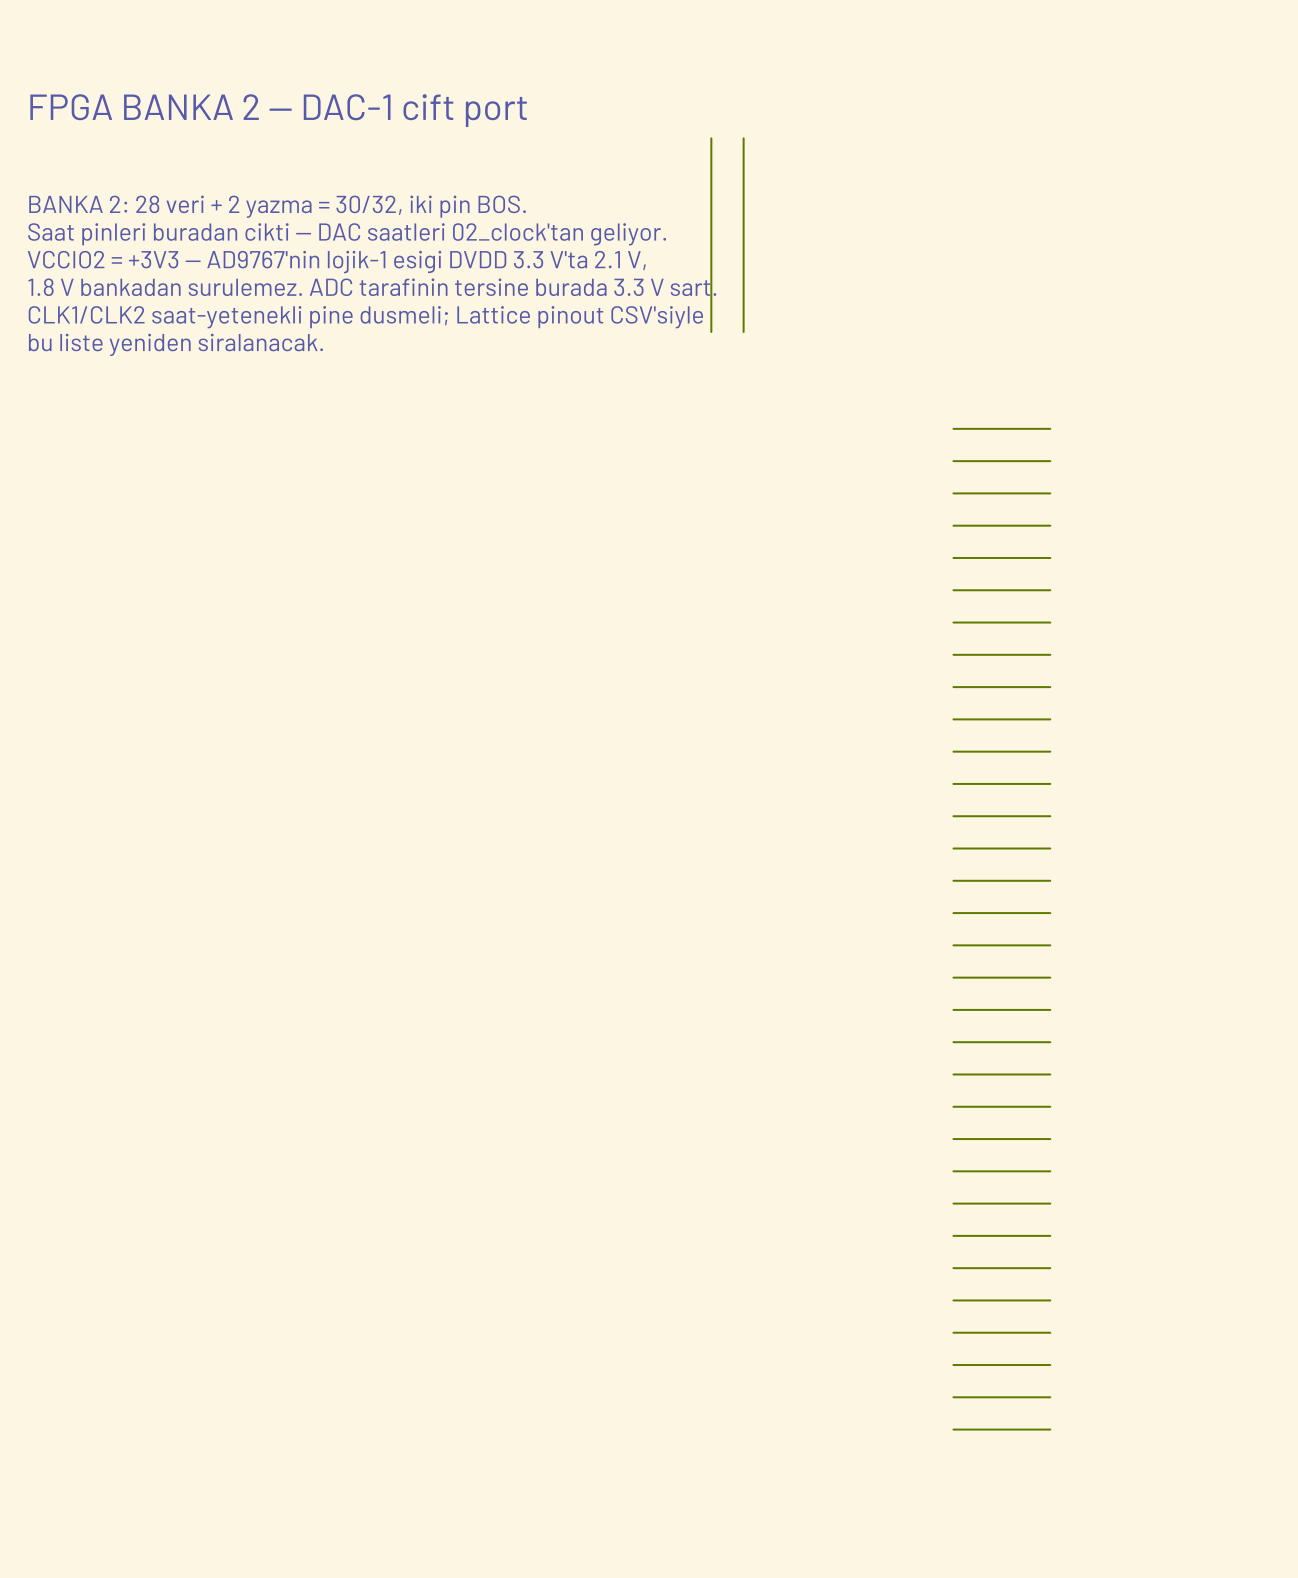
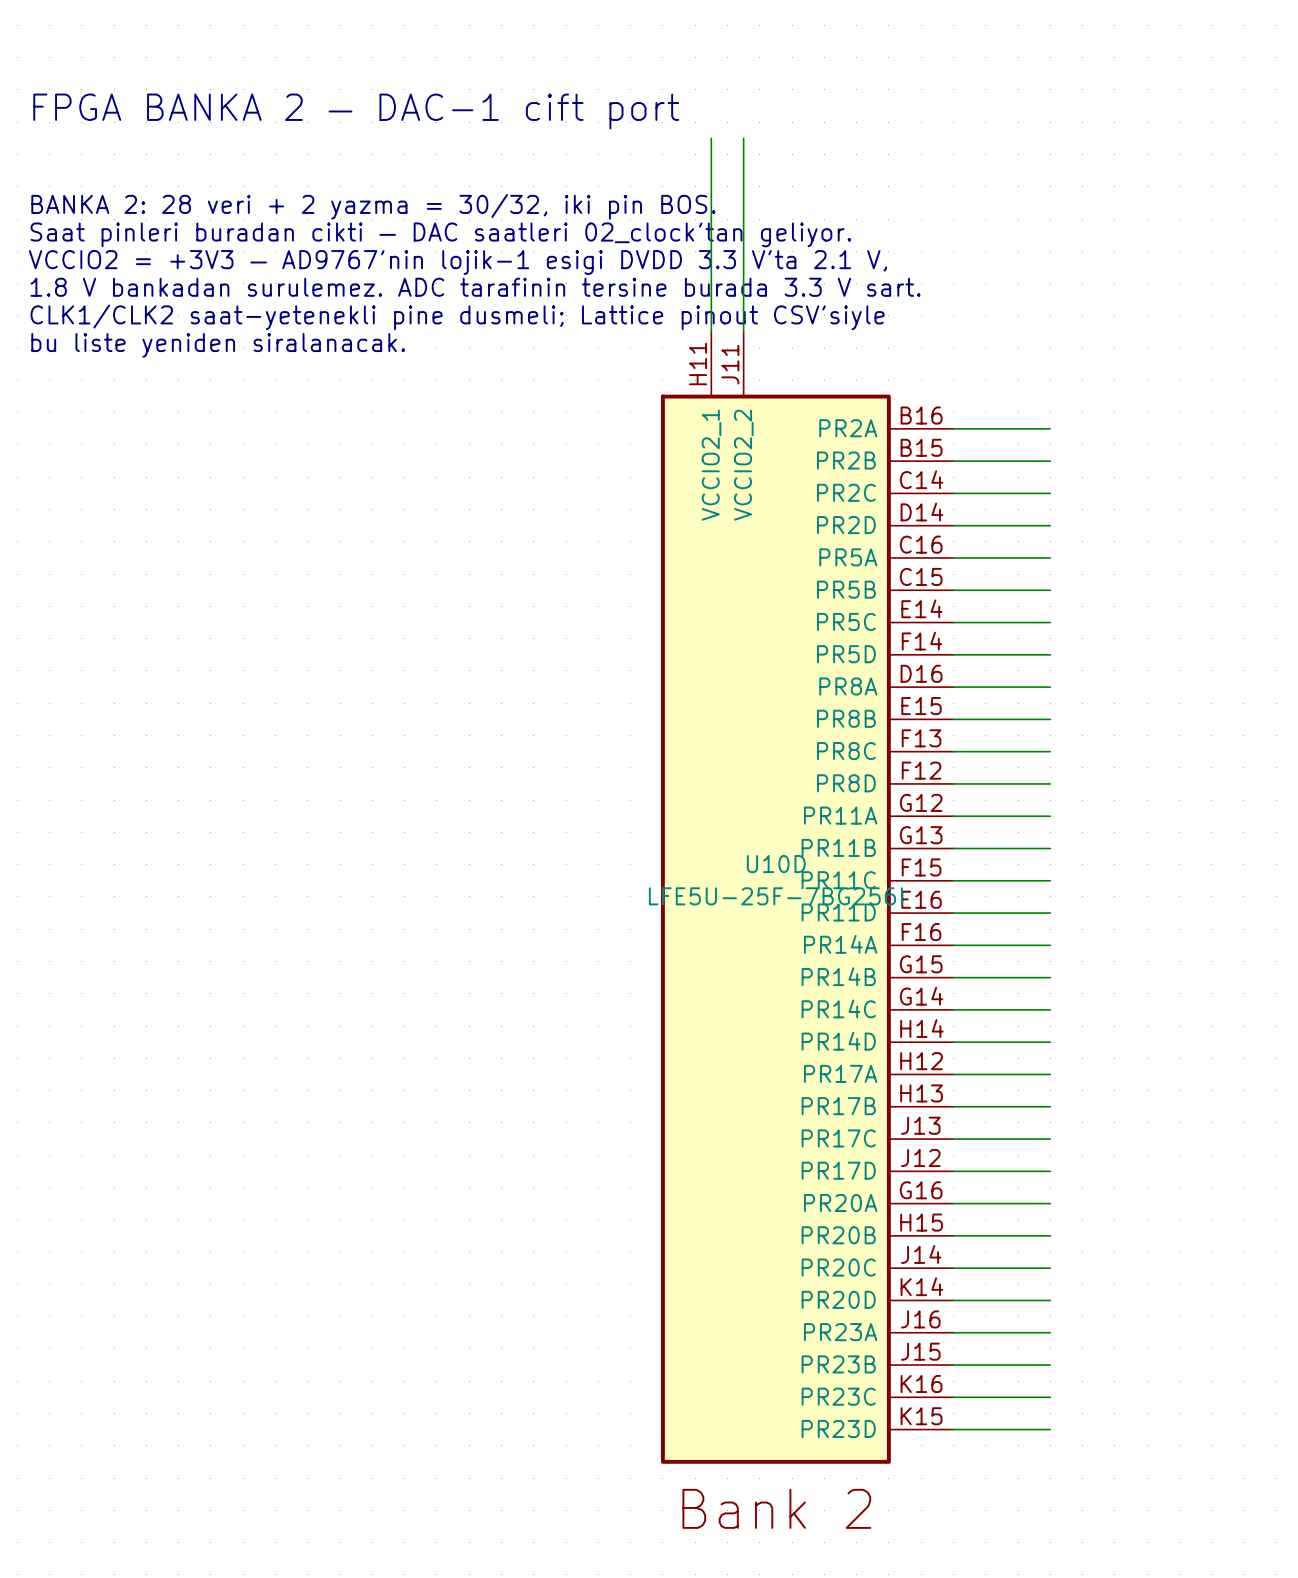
U10D: none -> LFE5U-25F-7BG256I (807, 897)

